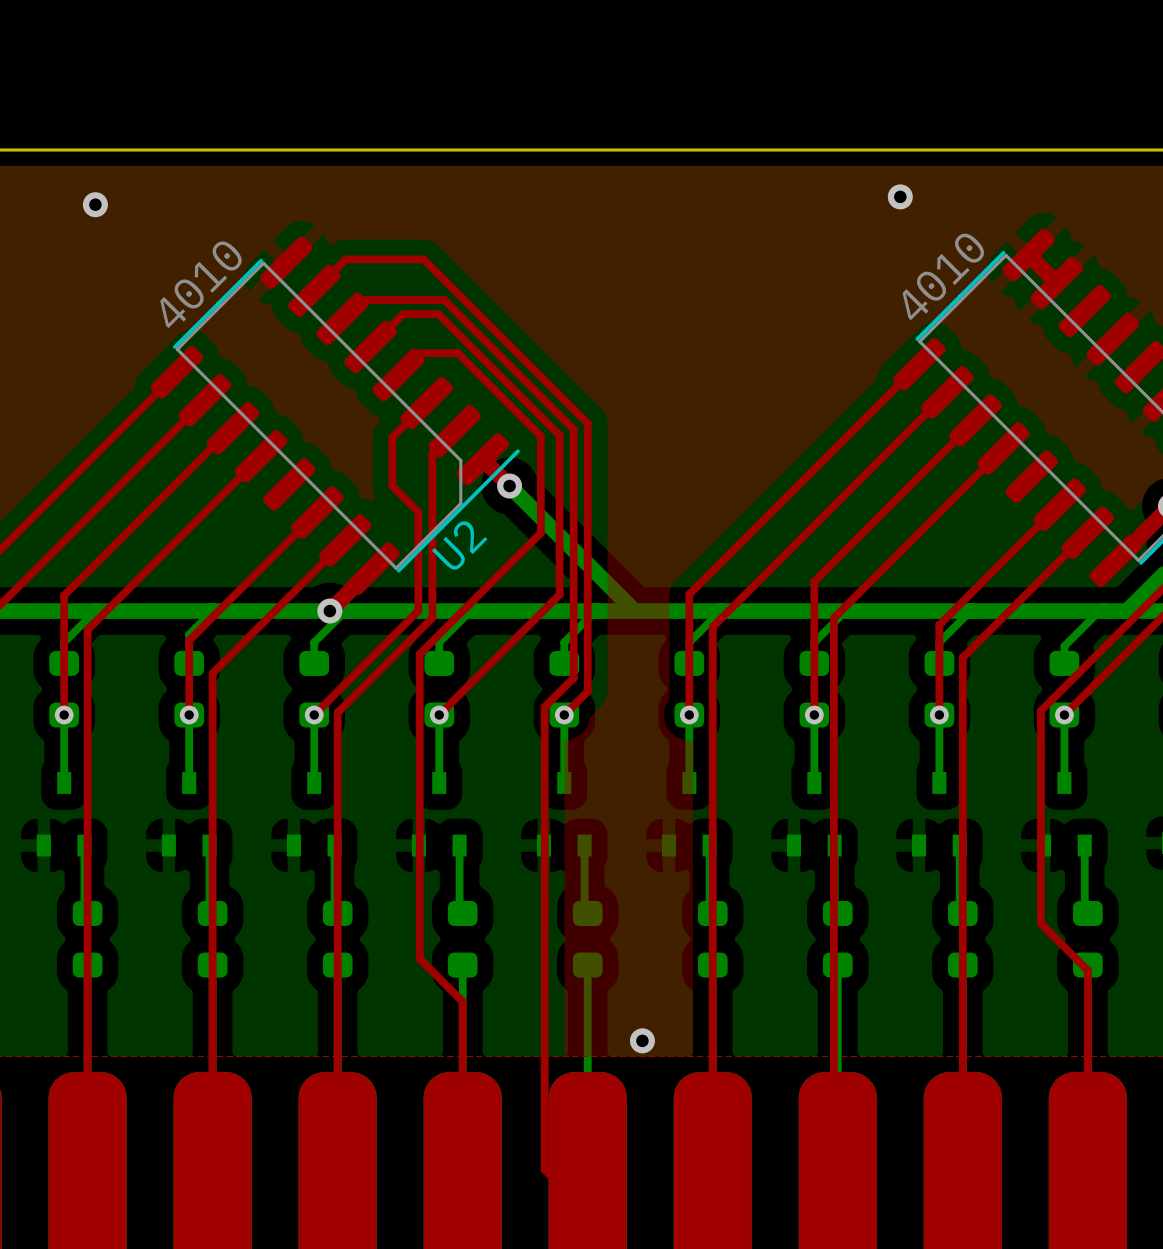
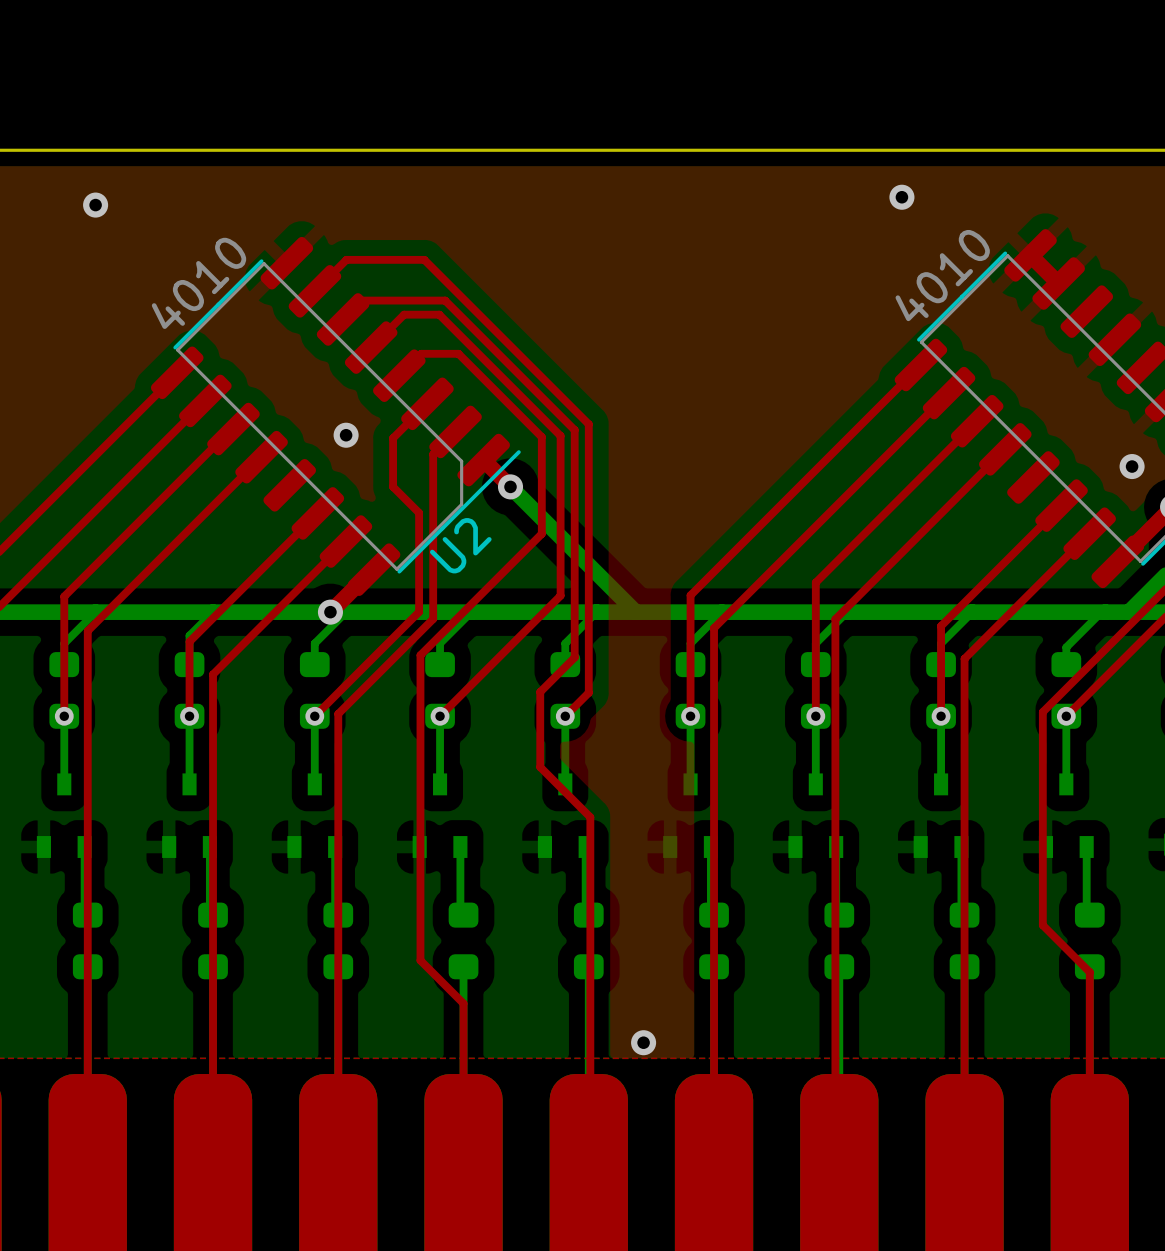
via: none -> (346, 435)
via: none -> (1132, 466)
top track: (573, 656) (573, 677) (544, 706) (544, 1169) (587, 1212) -> (574, 657) (540, 692) (540, 767) (590, 817) (590, 1214)

